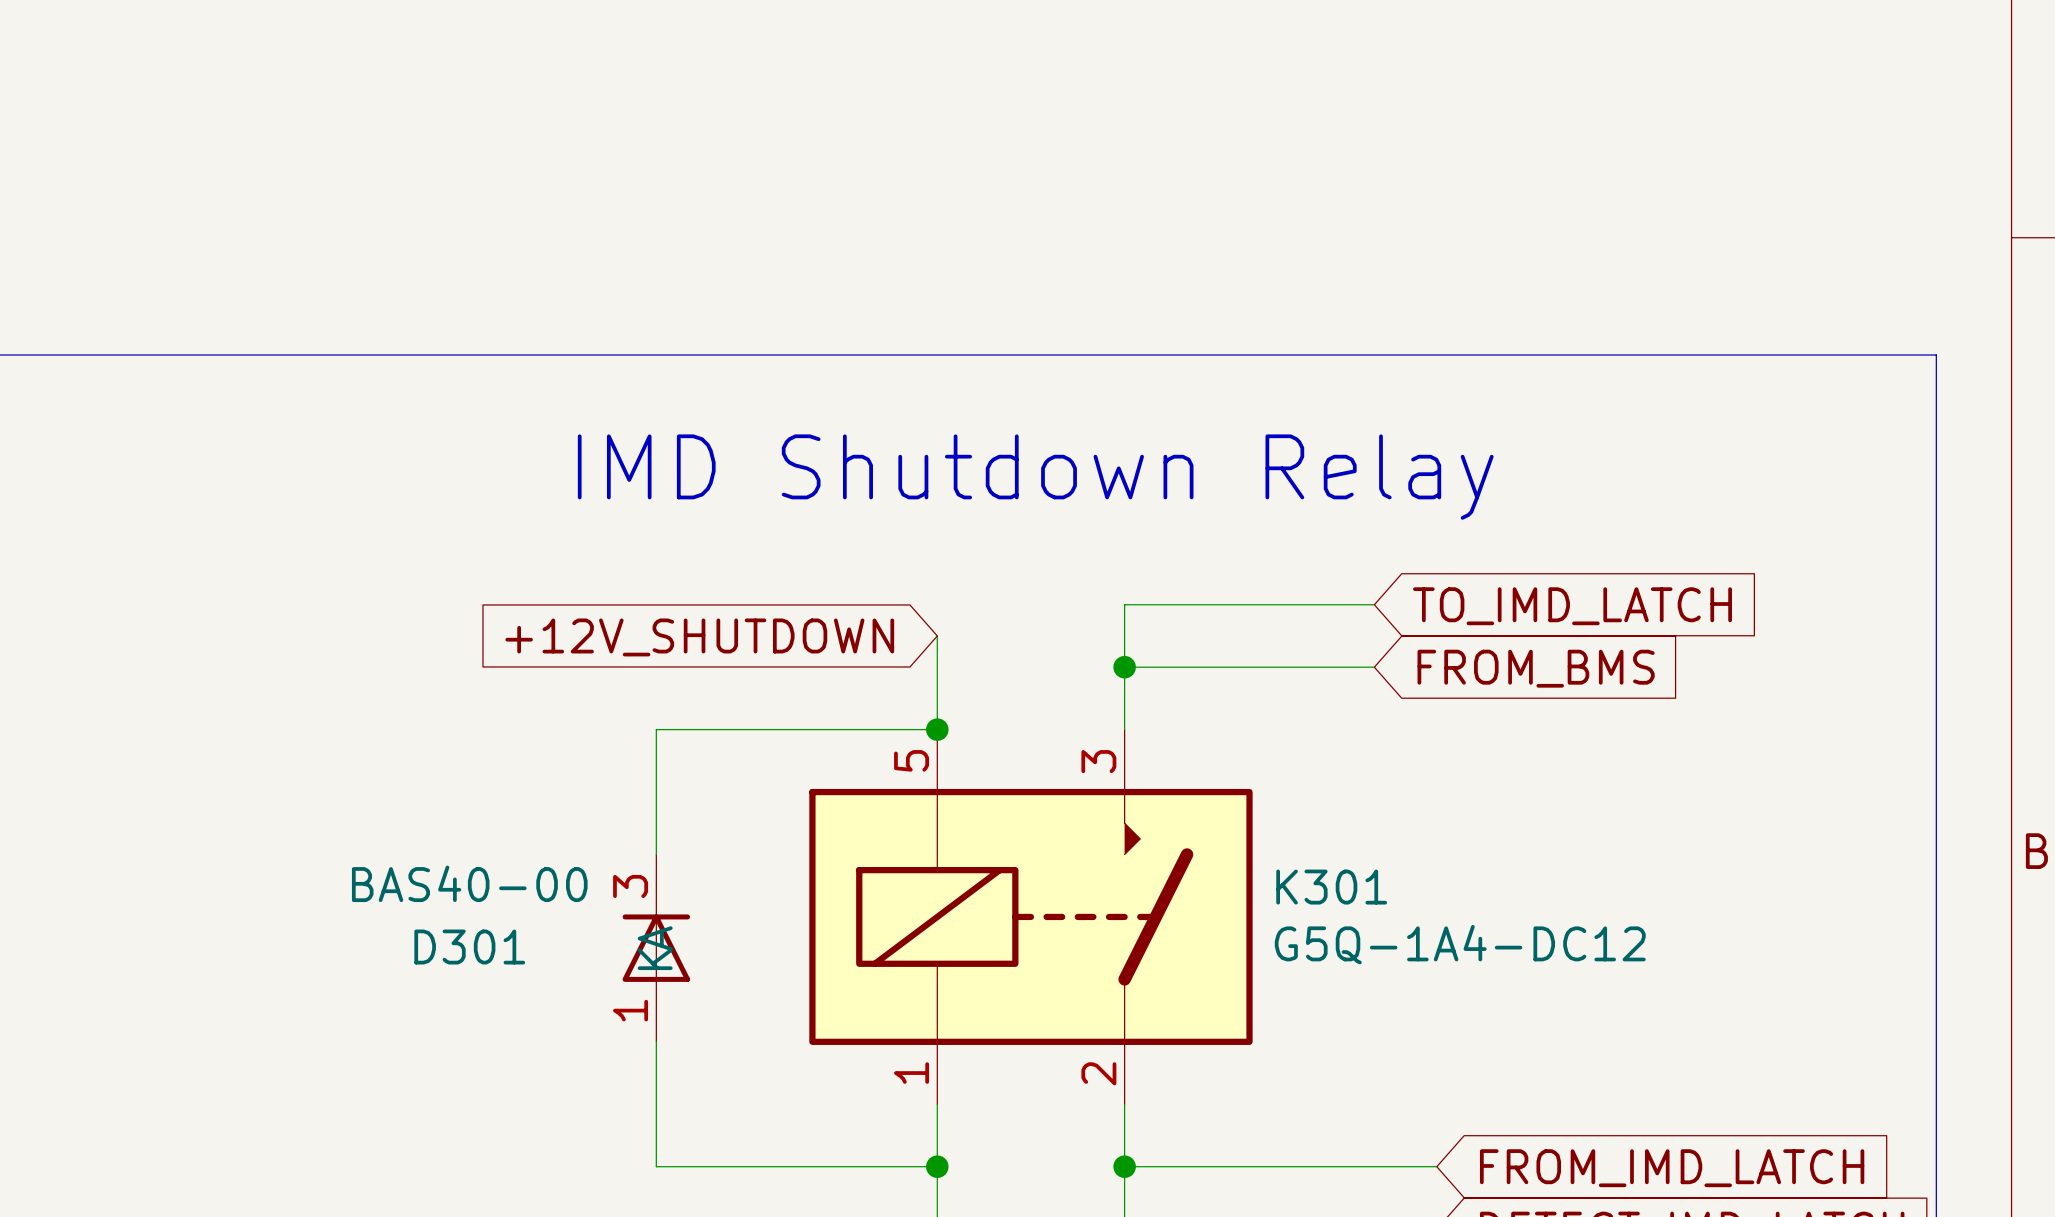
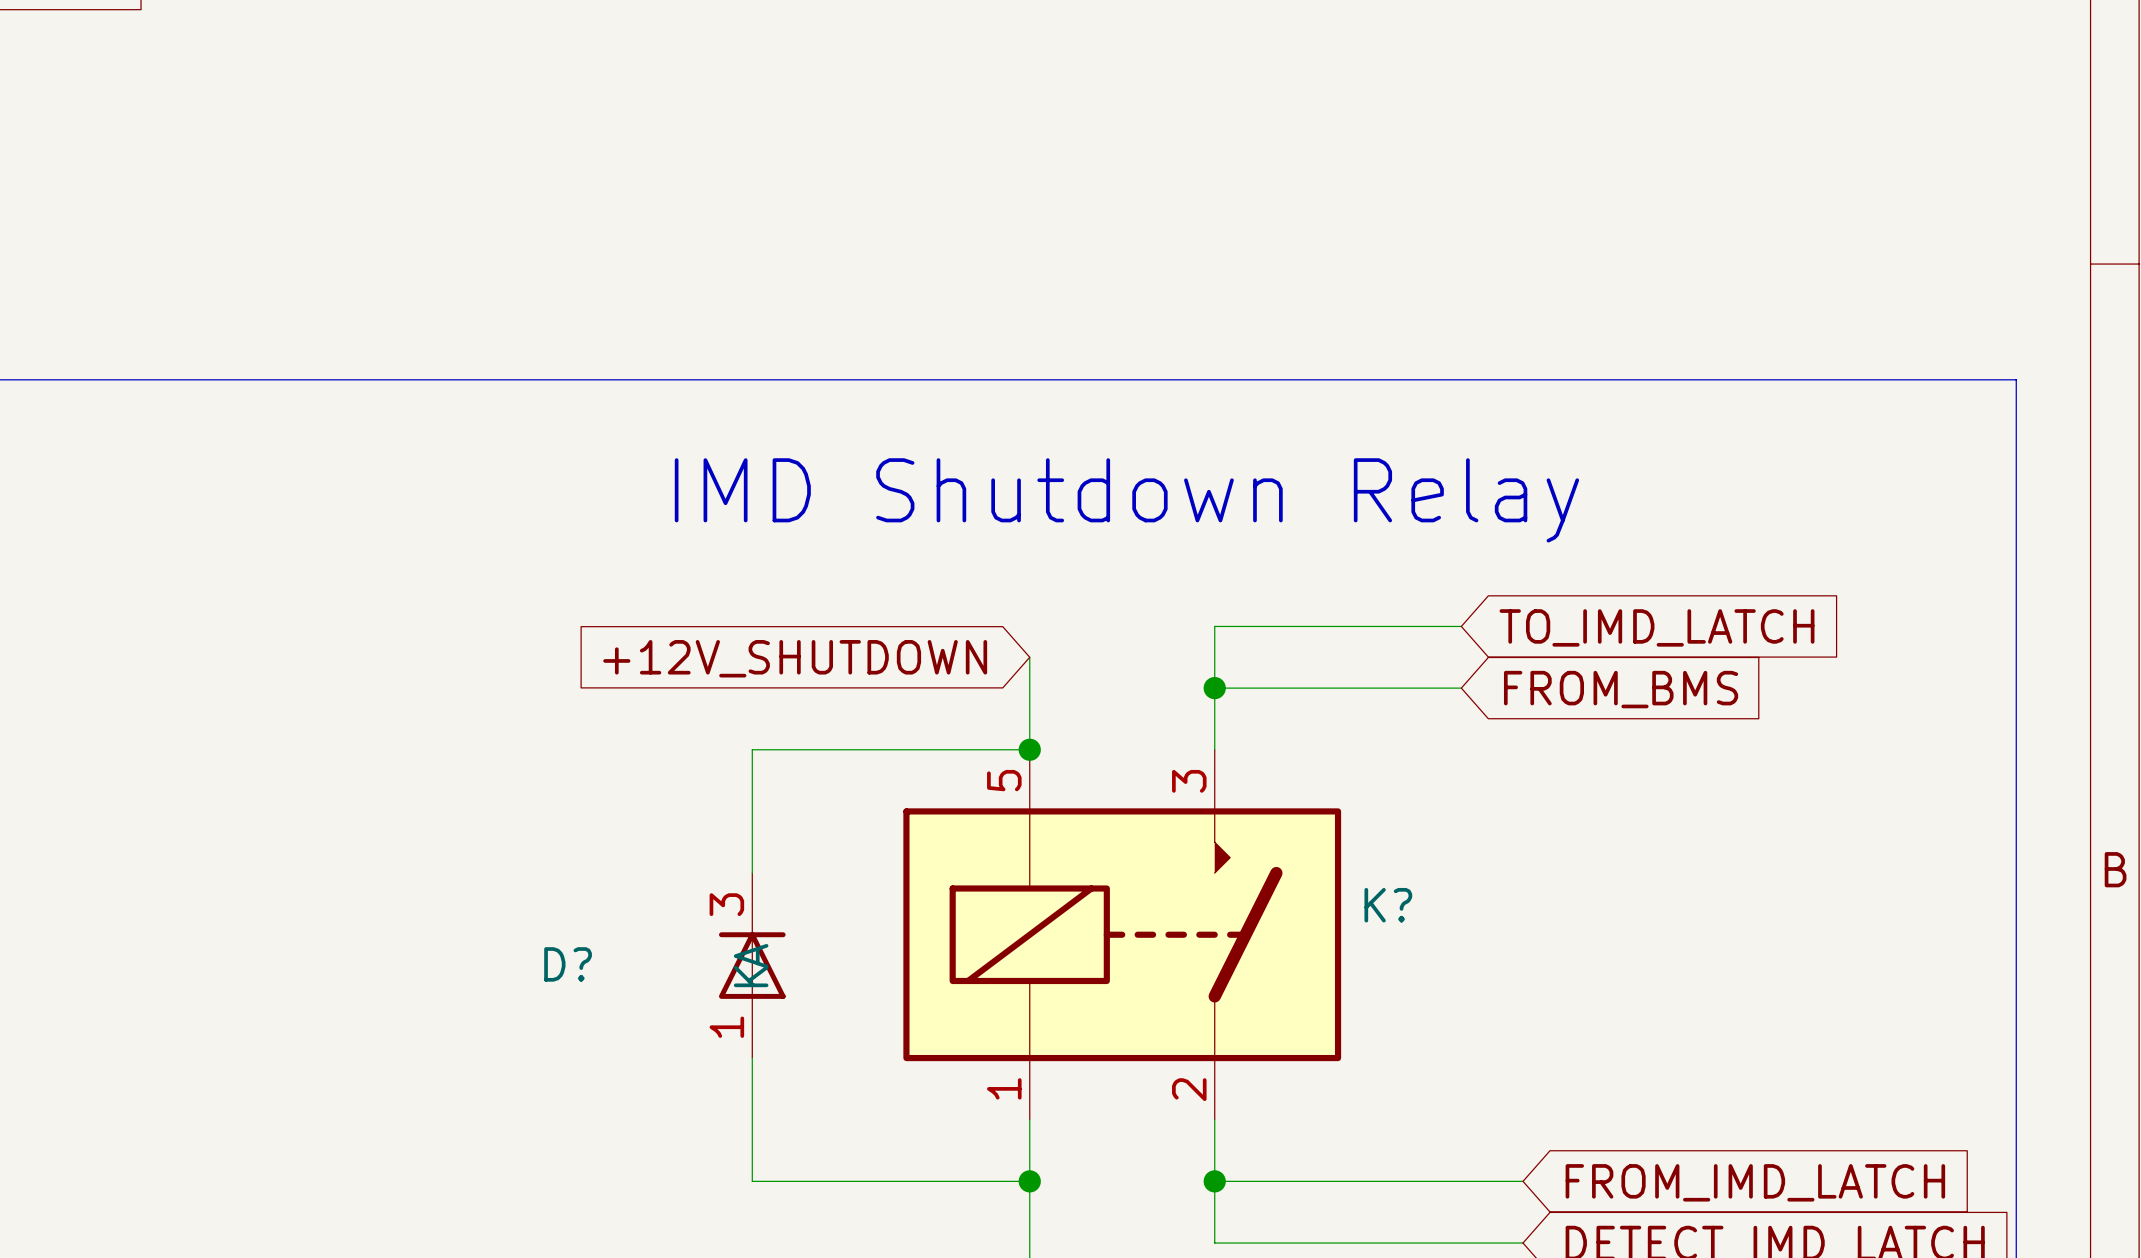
D301 value: BAS40-00 (469, 883) -> none
K301 name: K301 (1331, 887) -> K? (1388, 905)
K301 value: G5Q-1A4-DC12 (1460, 944) -> none
D301 name: D301 (469, 947) -> D? (568, 964)

